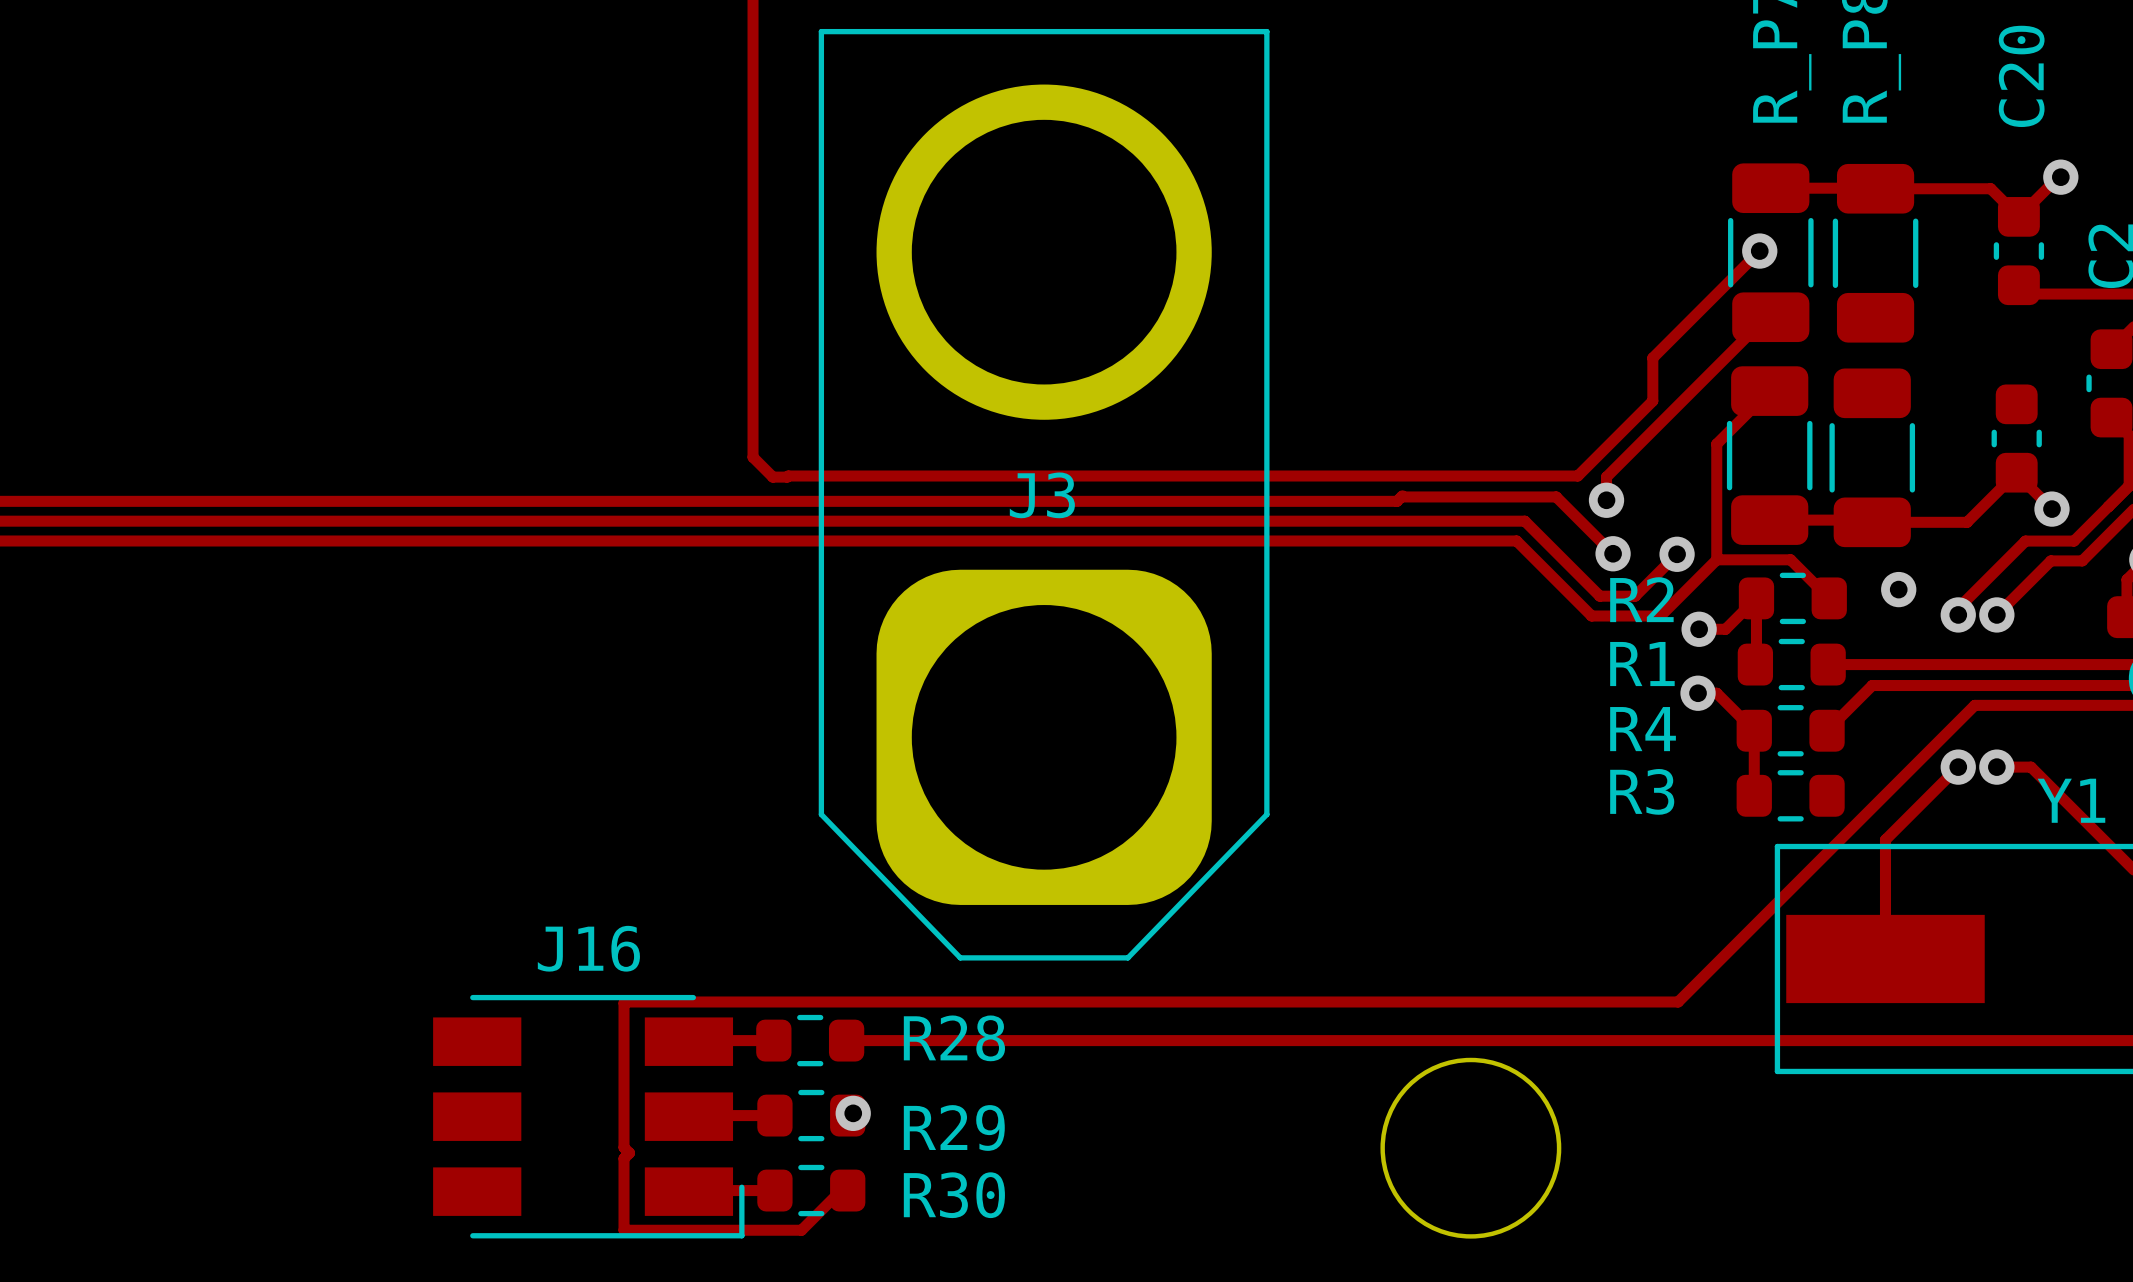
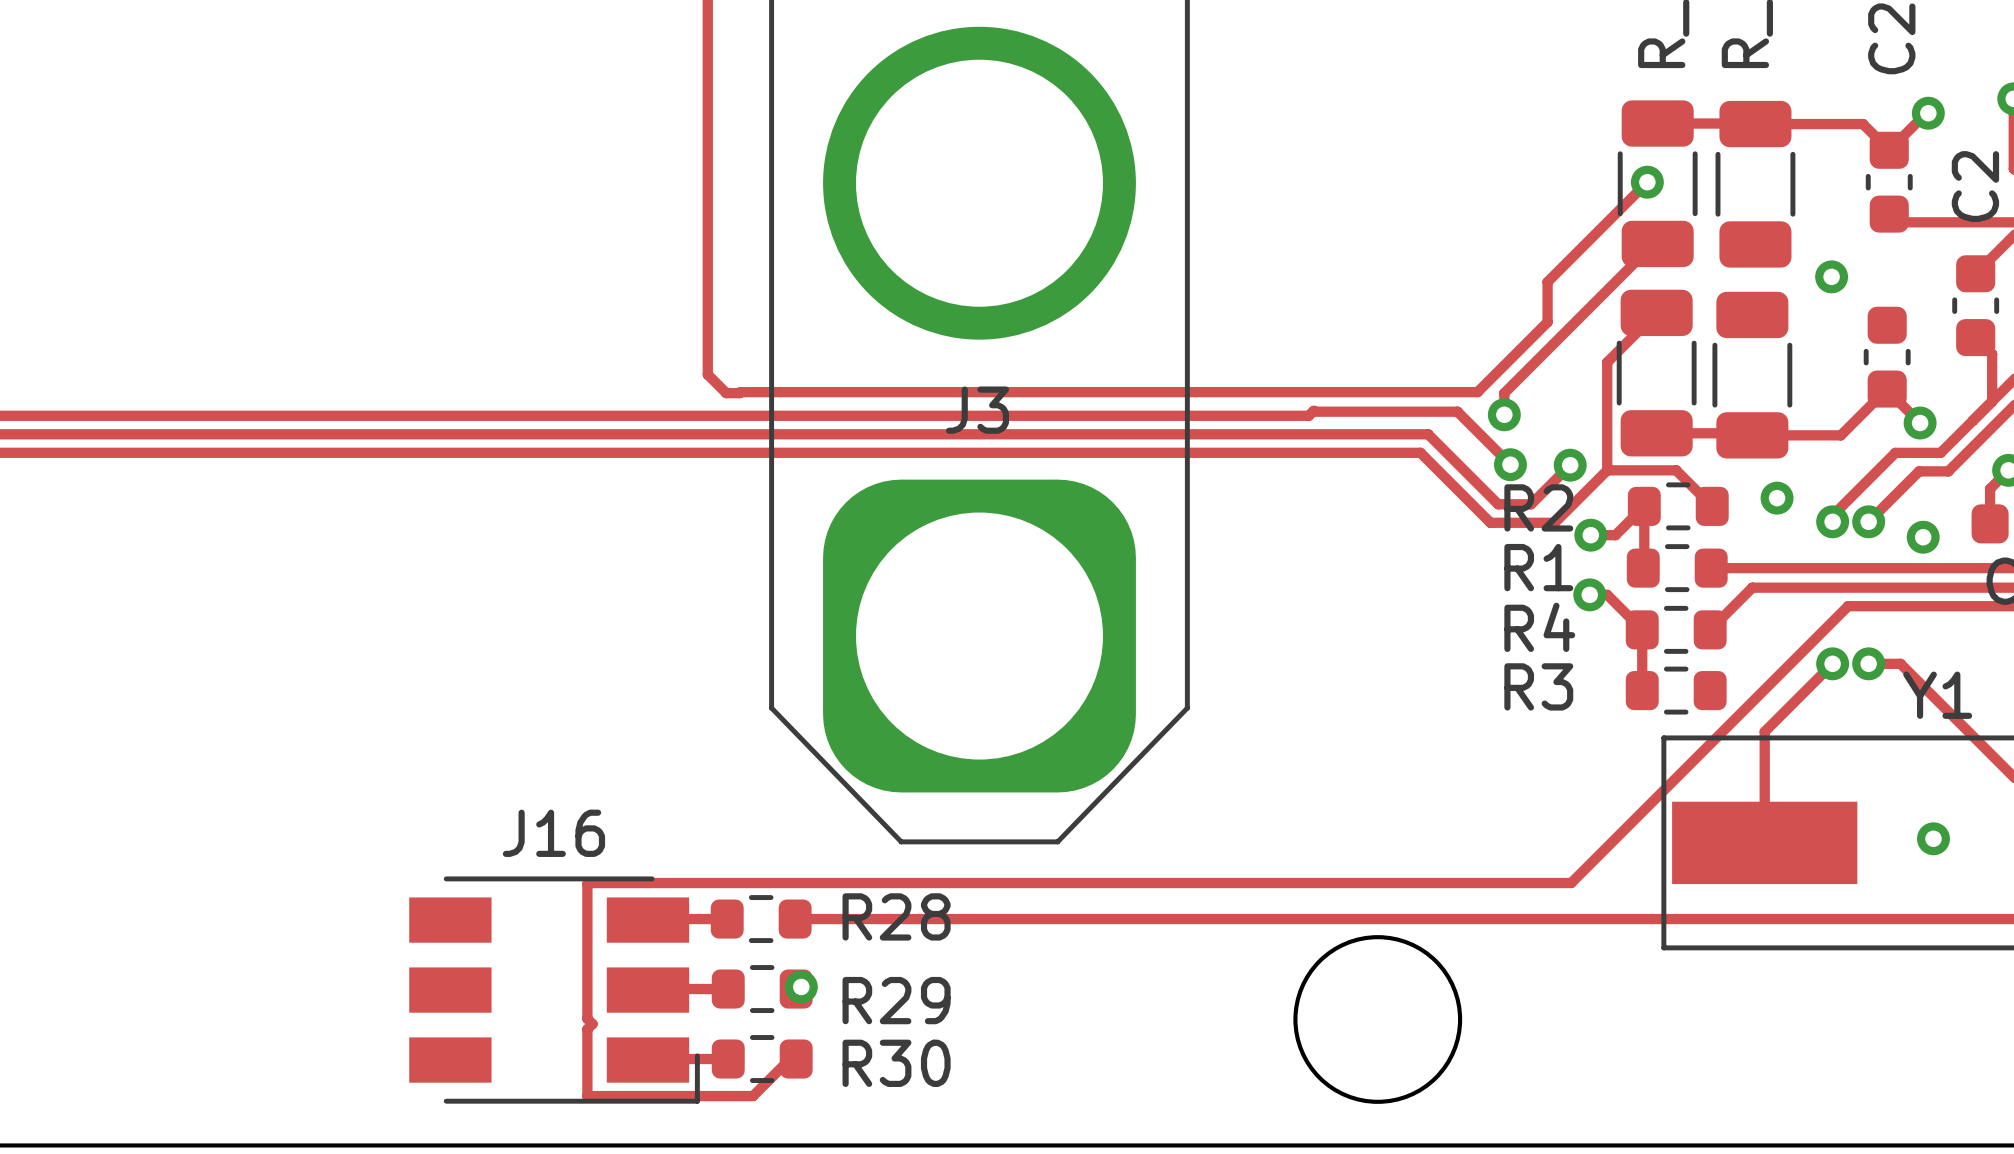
via: none -> (1831, 276)
via: none -> (1923, 537)
via: none -> (1933, 838)

